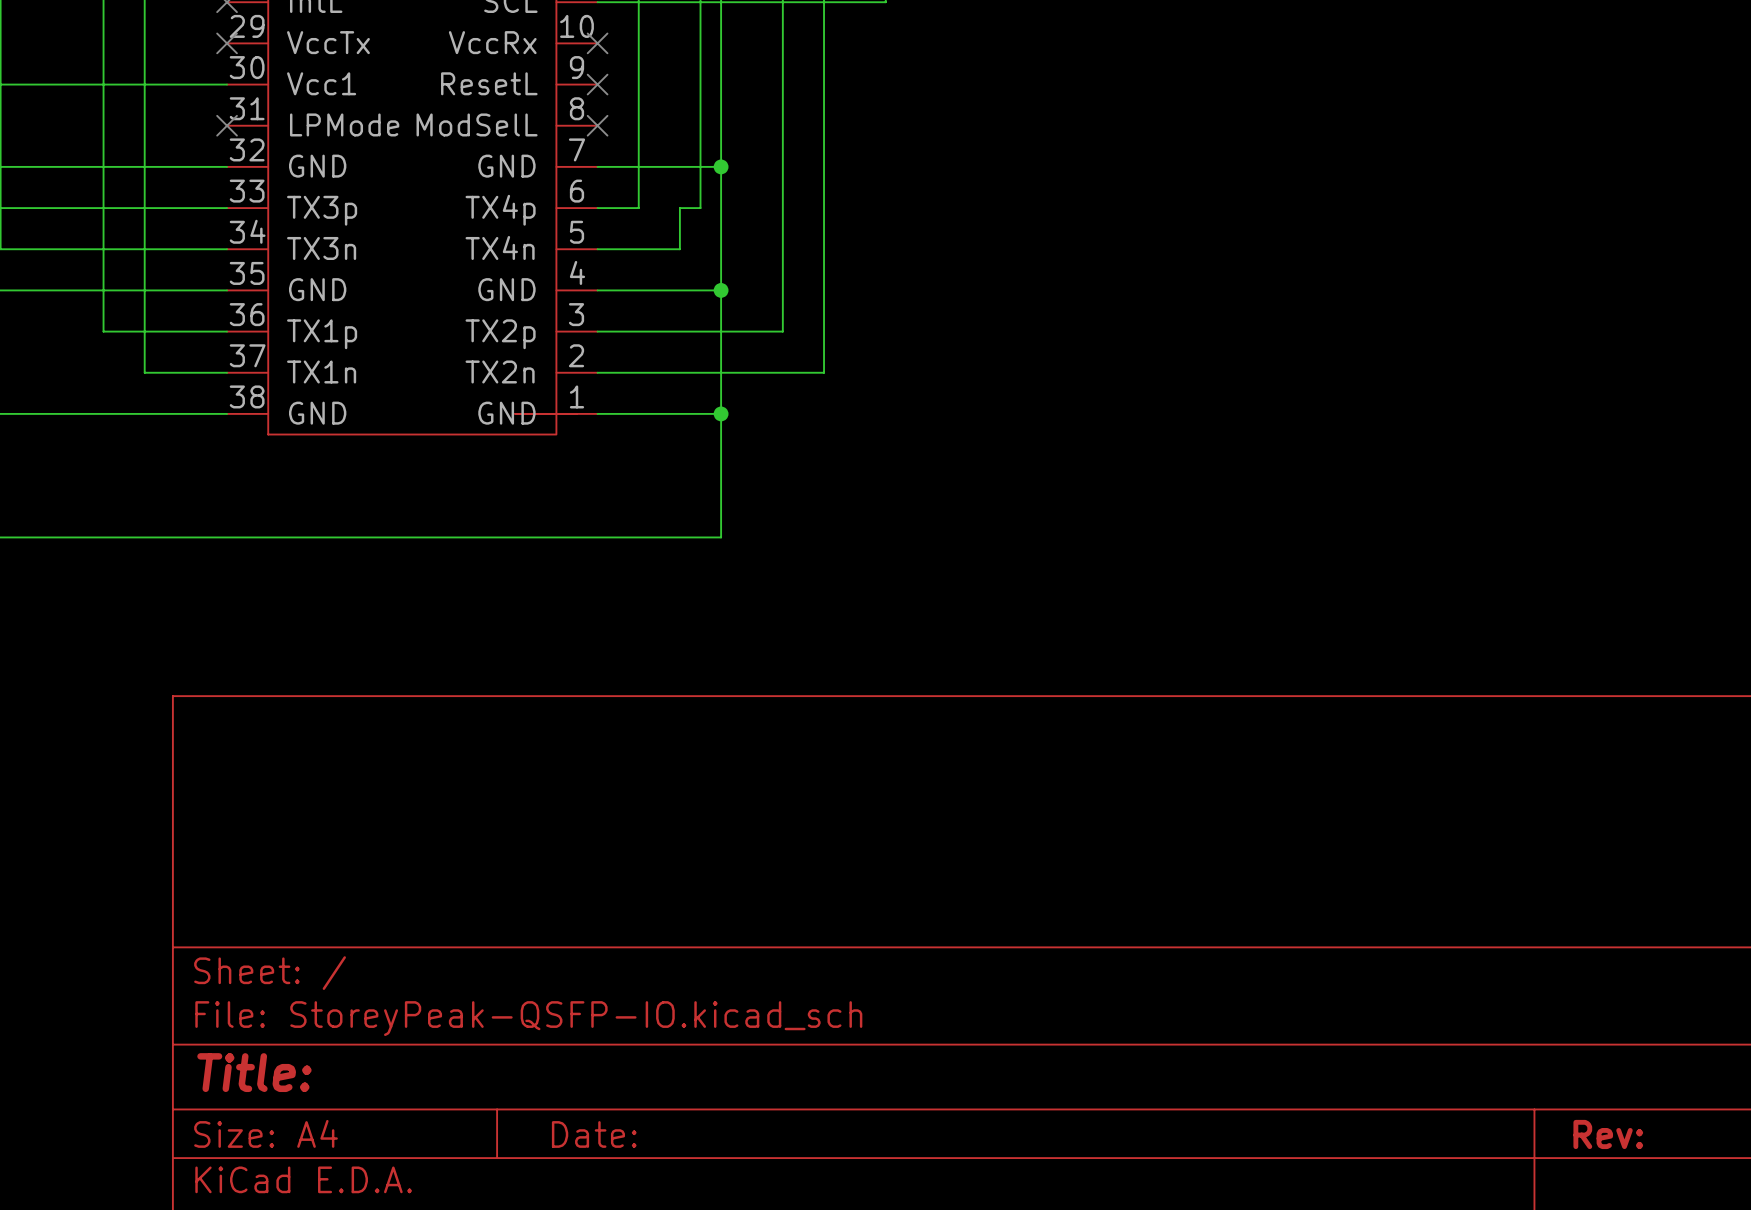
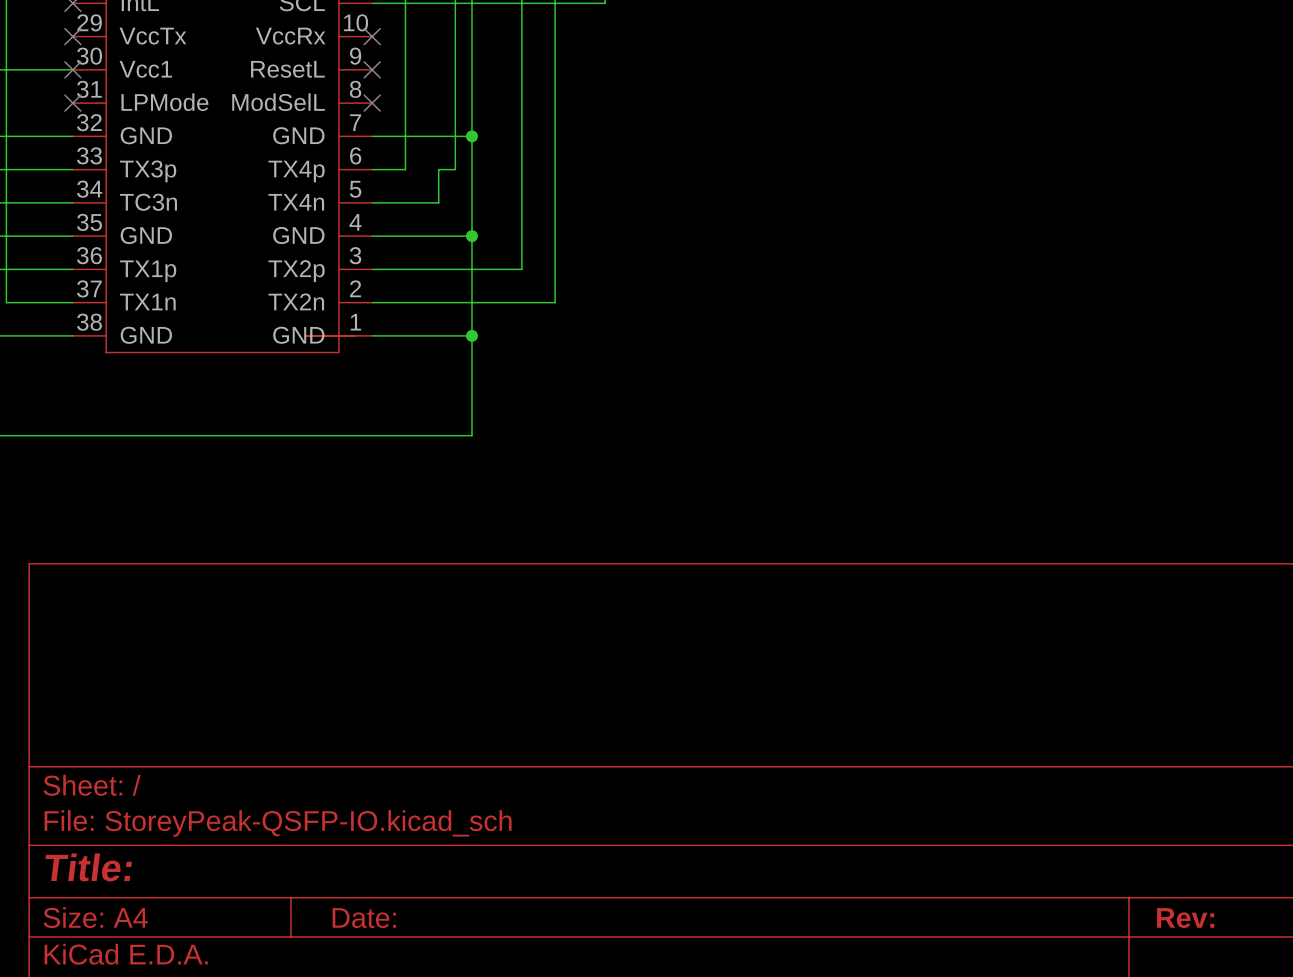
no-connect mark: none -> (72, 69)
part pin name: TX3n (321, 248) -> TC3n (148, 202)

